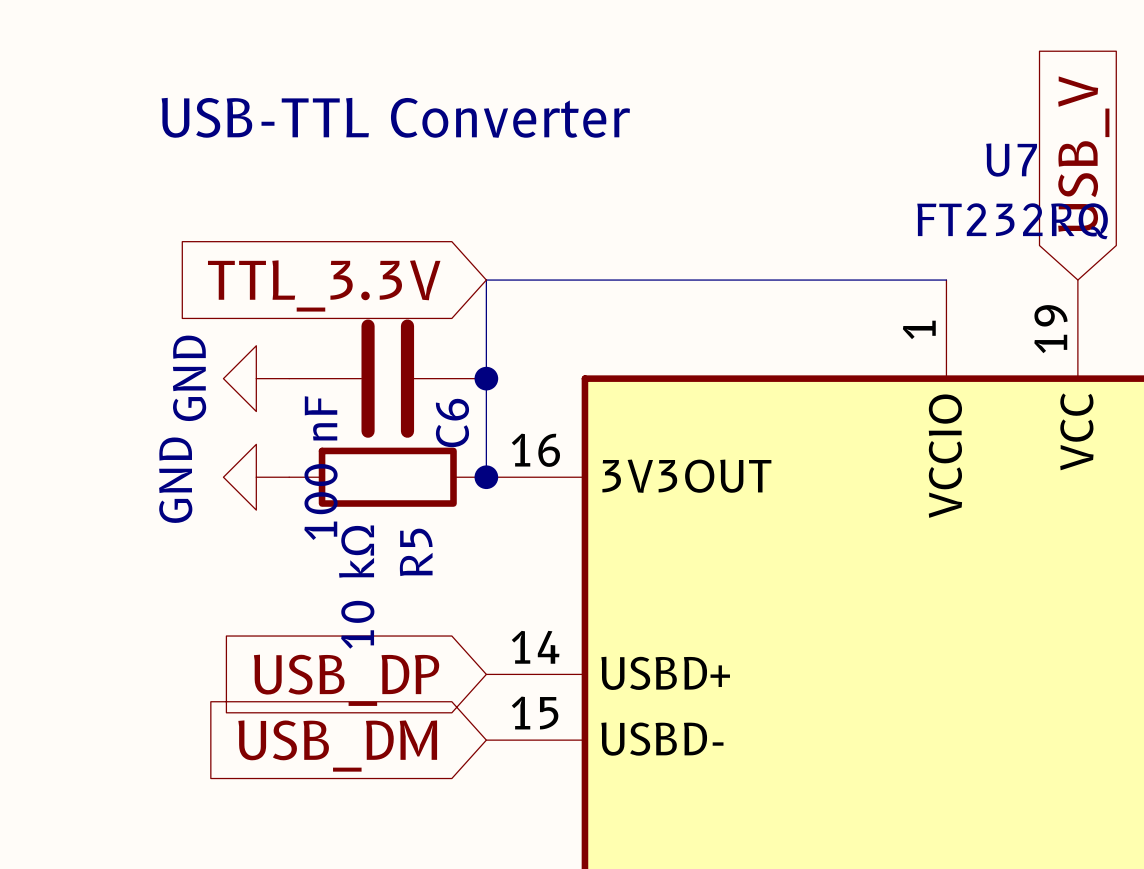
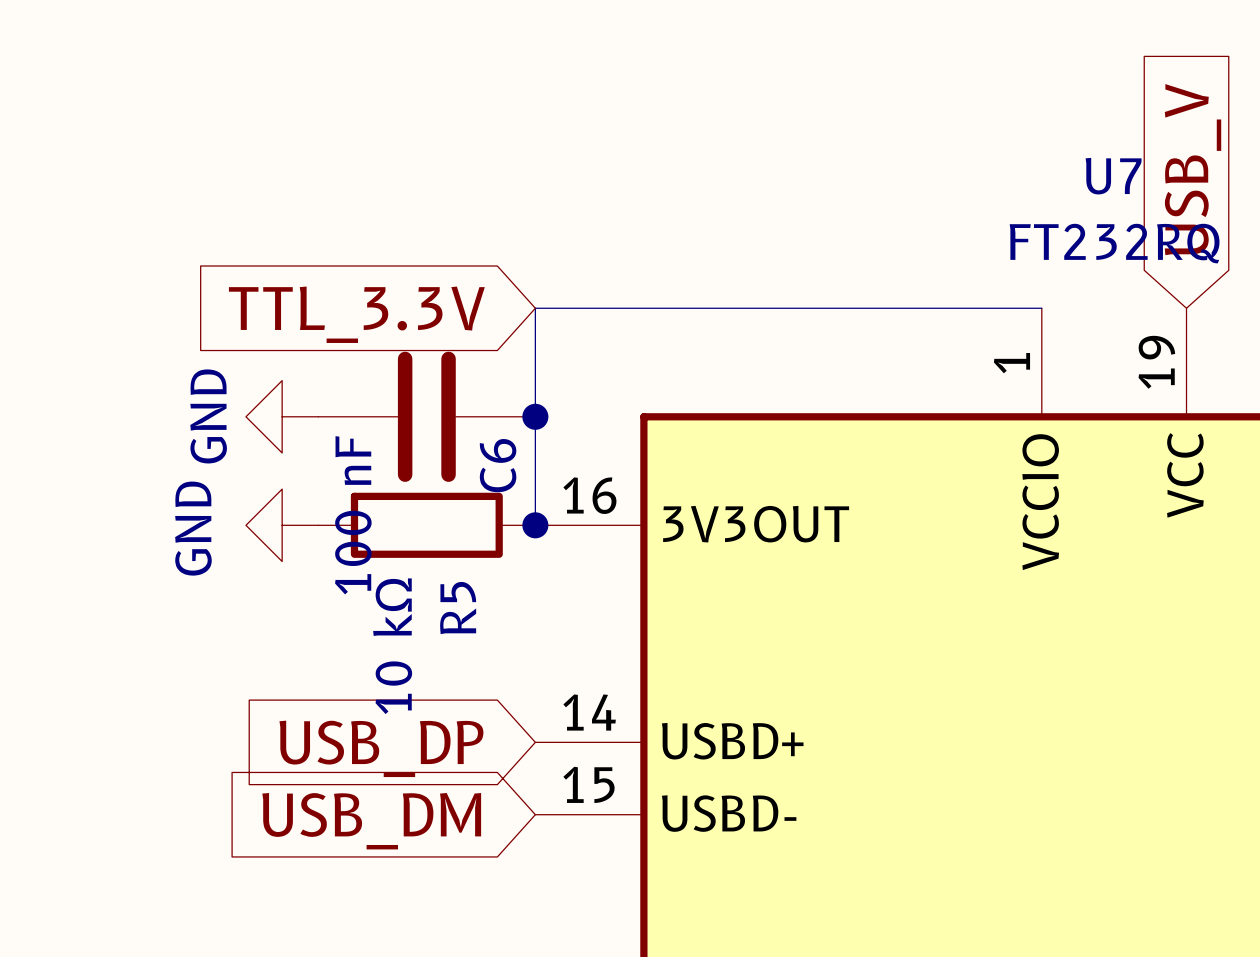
text: USB-TTL Converter (395, 117) -> none

